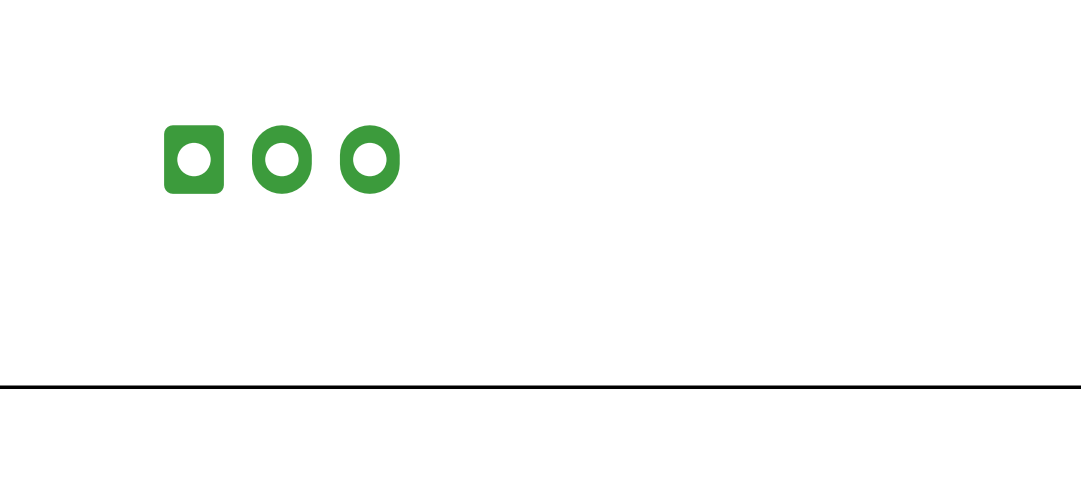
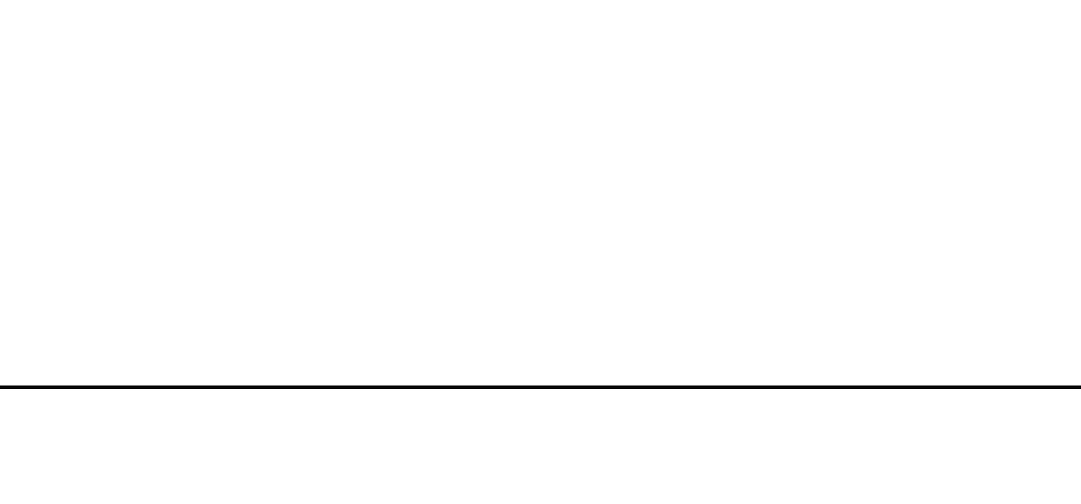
part: (281, 159) -> none

